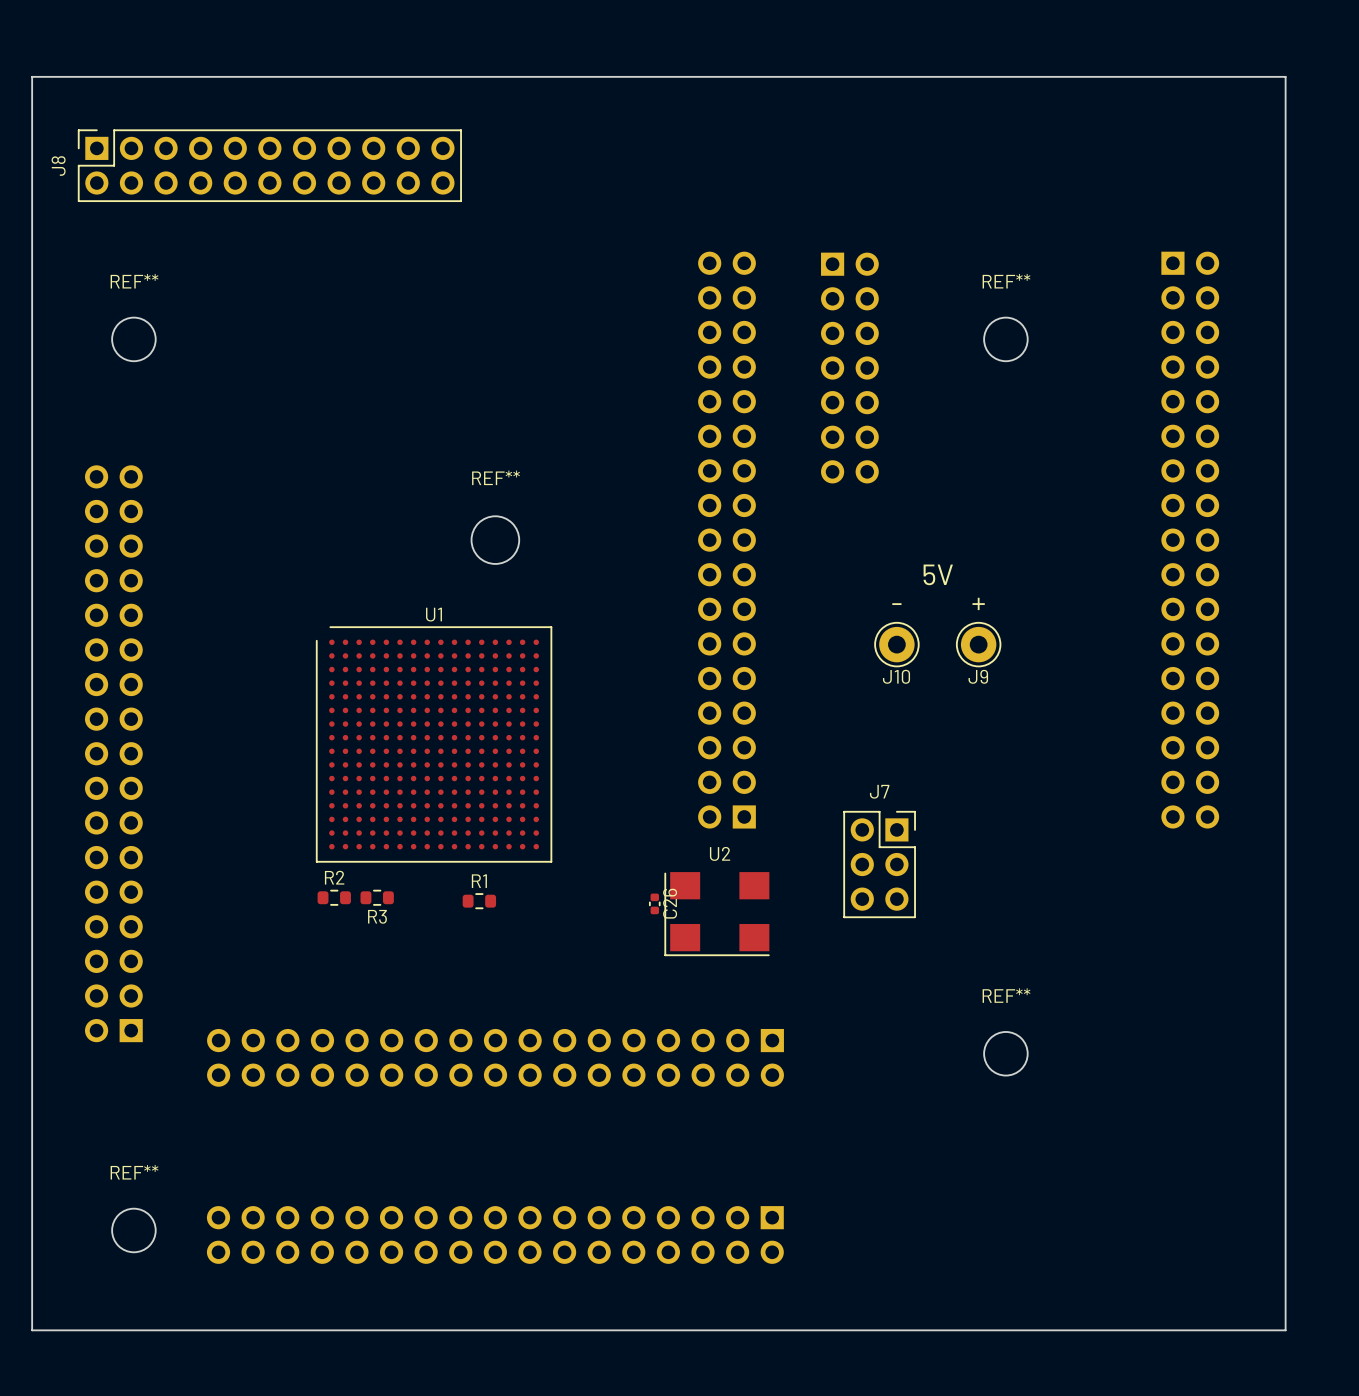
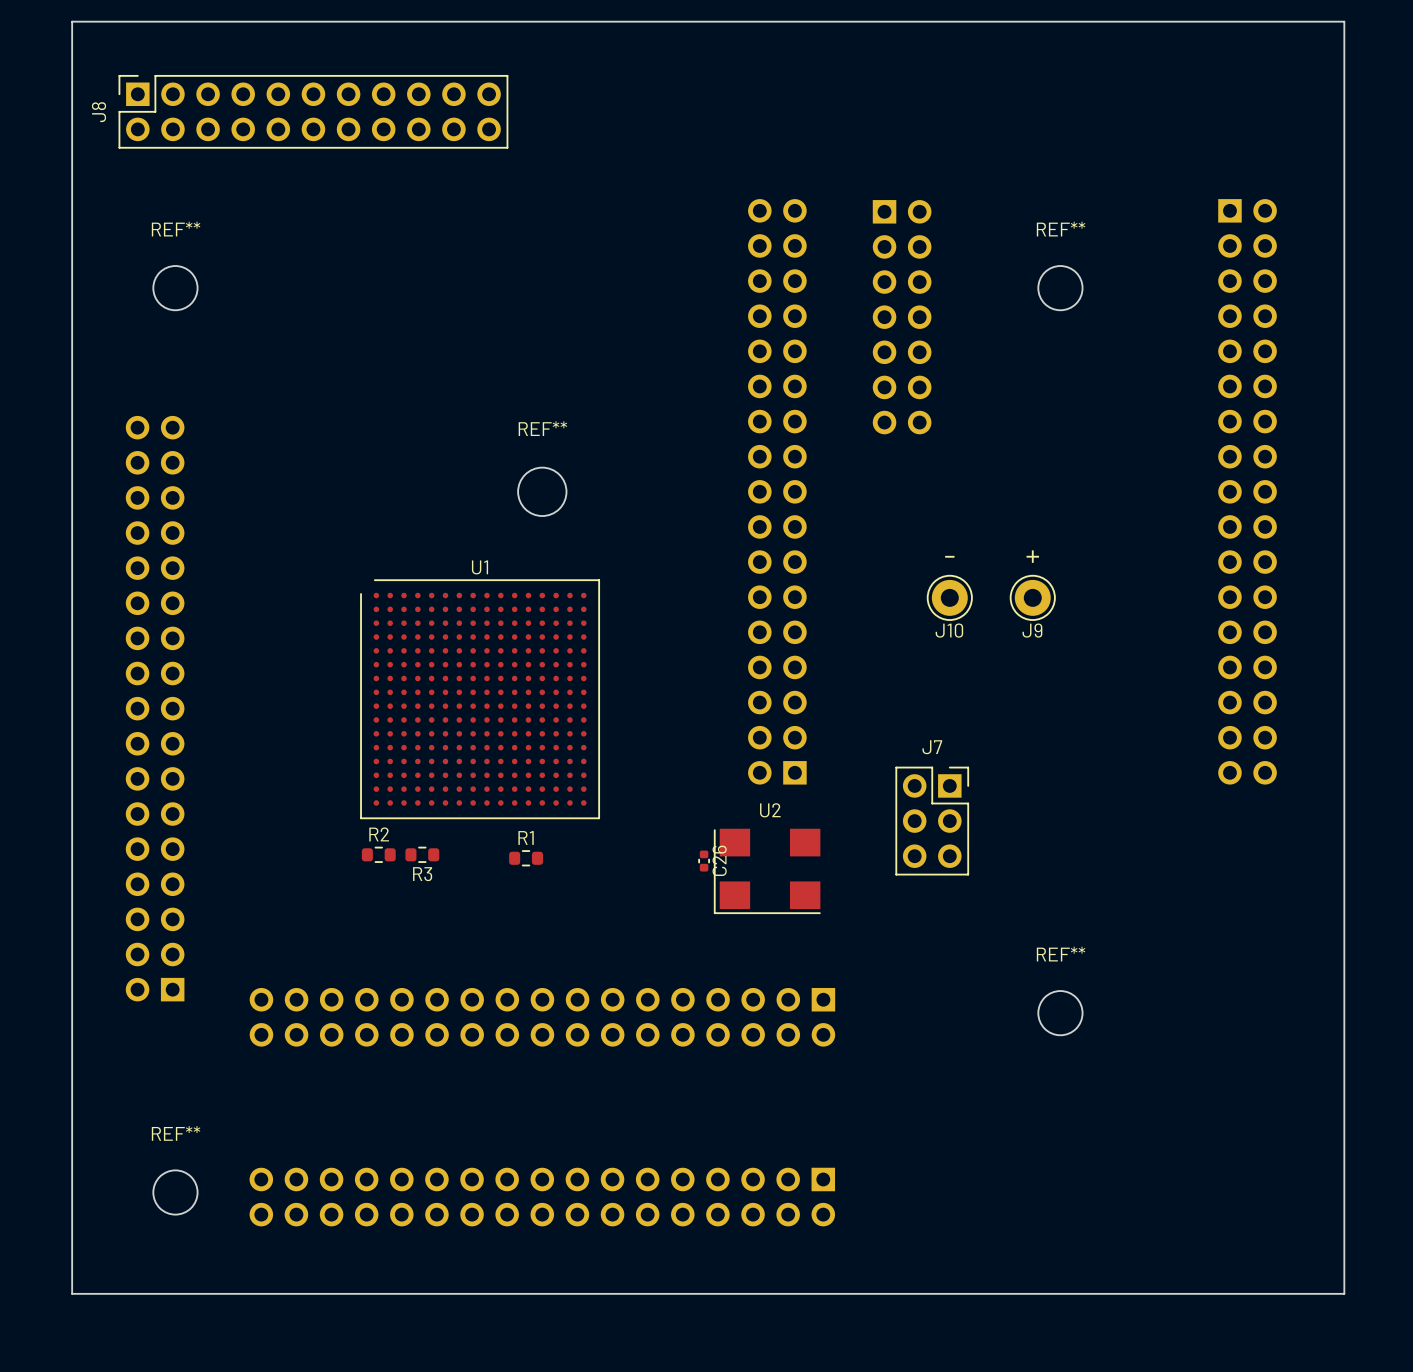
text: 5V (938, 574) -> none

